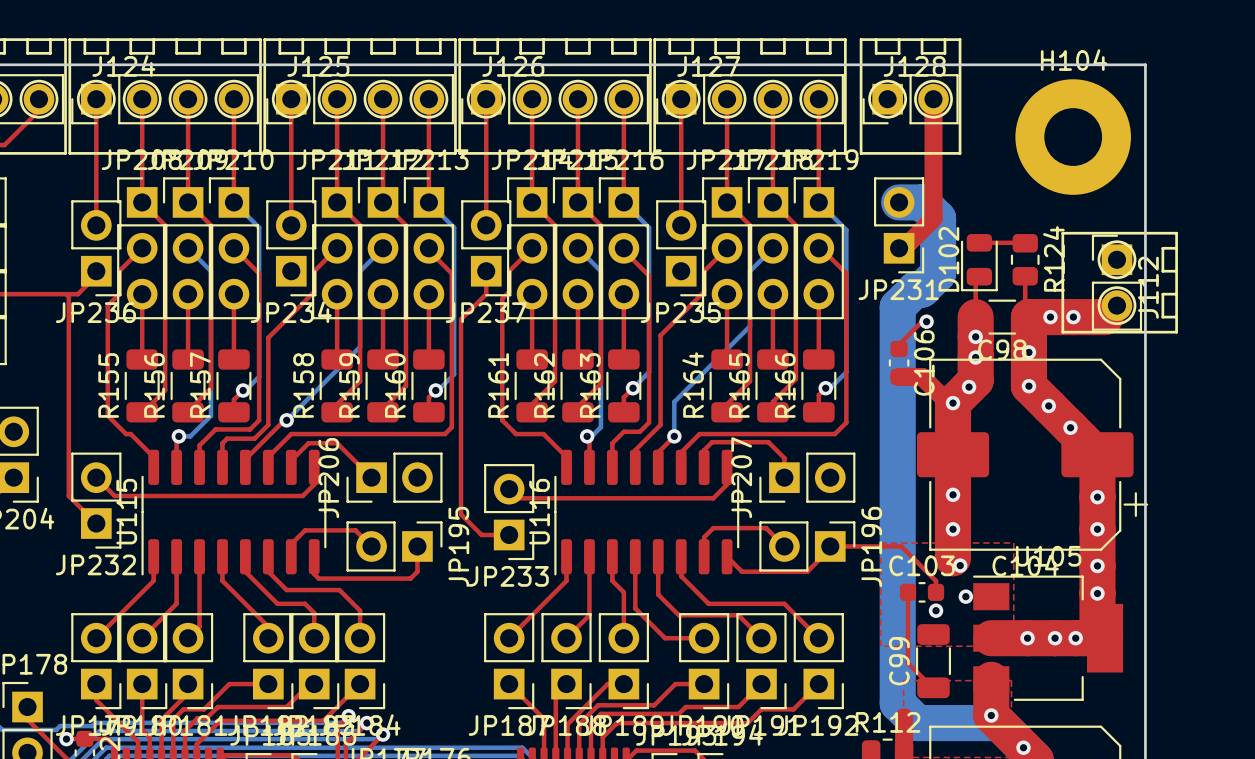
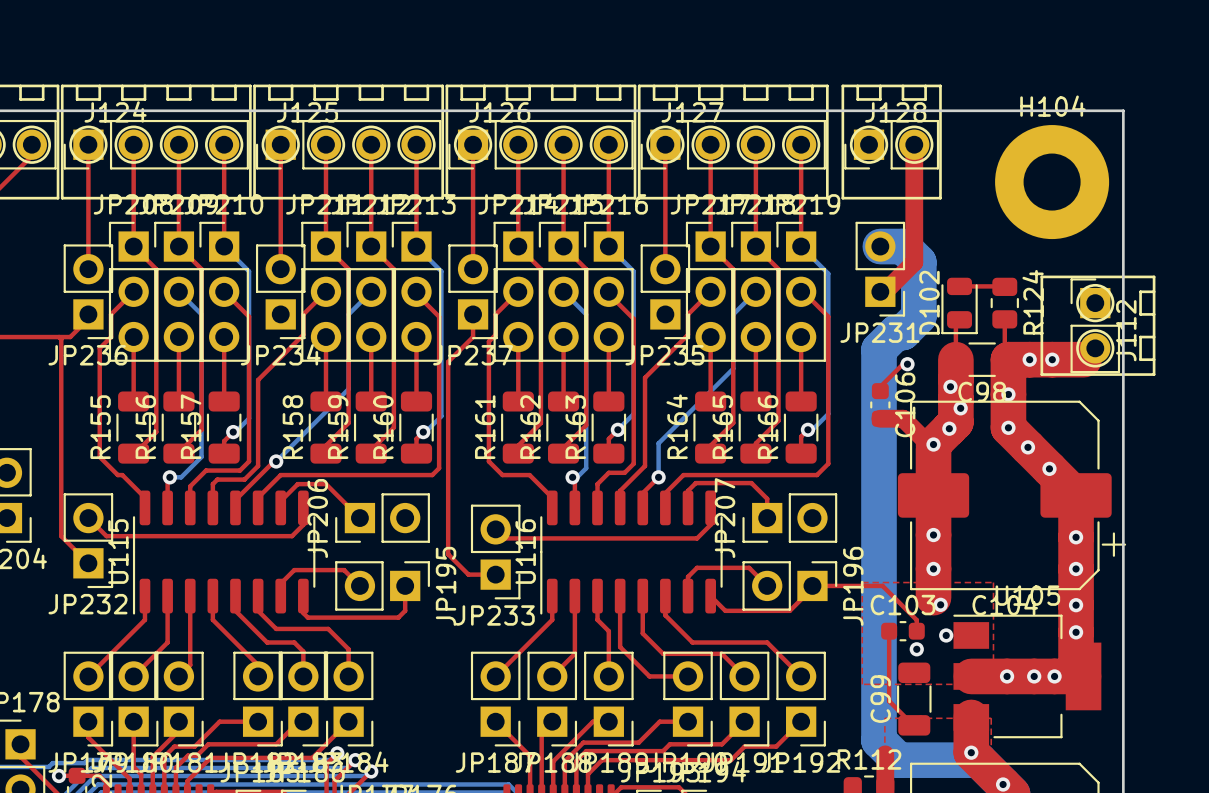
via: (975, 336) -> none
via: none -> (950, 386)
via: (975, 357) -> none
via: none -> (960, 408)

